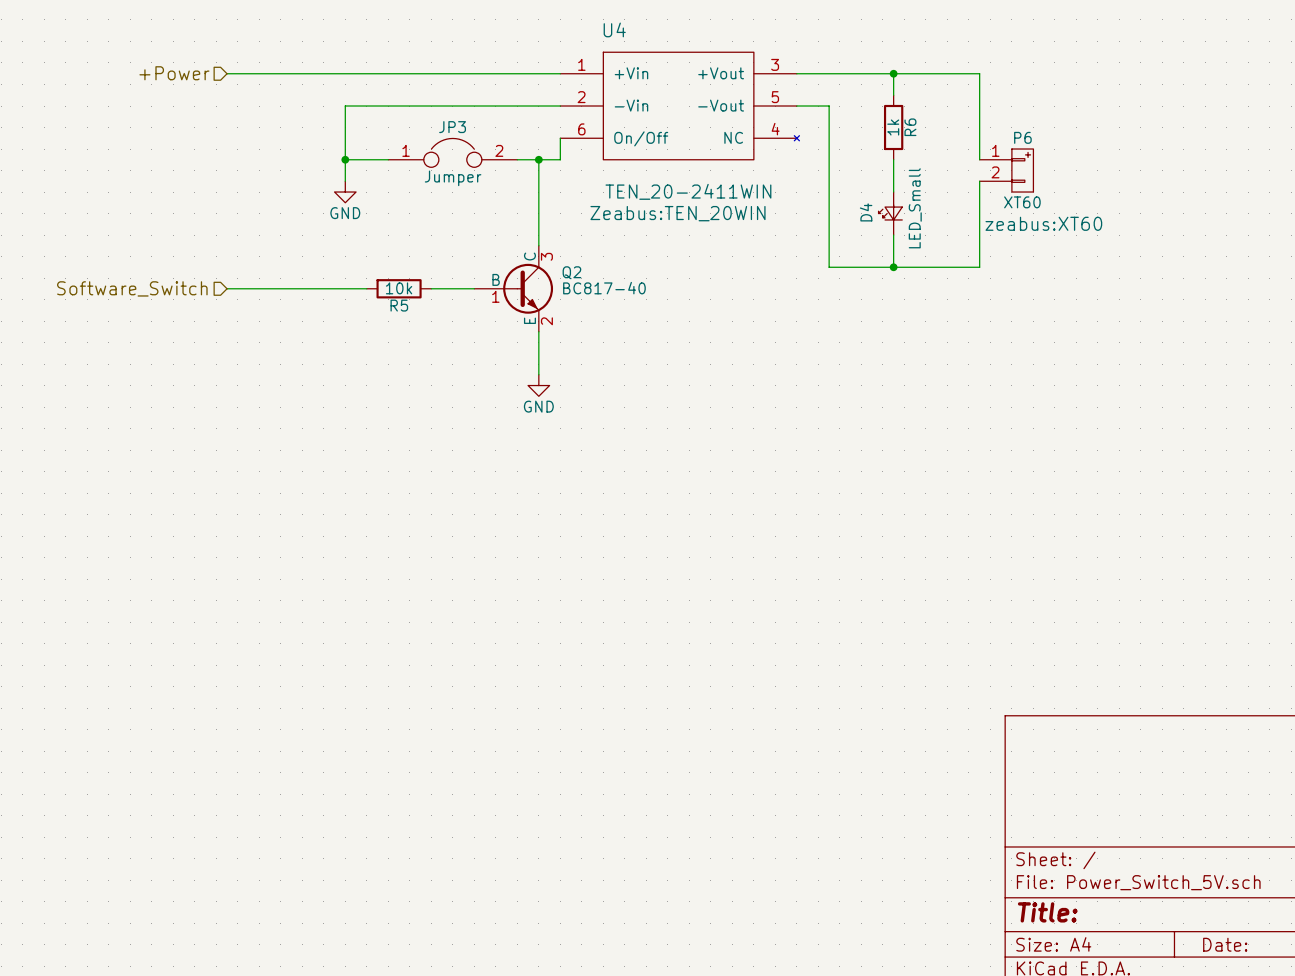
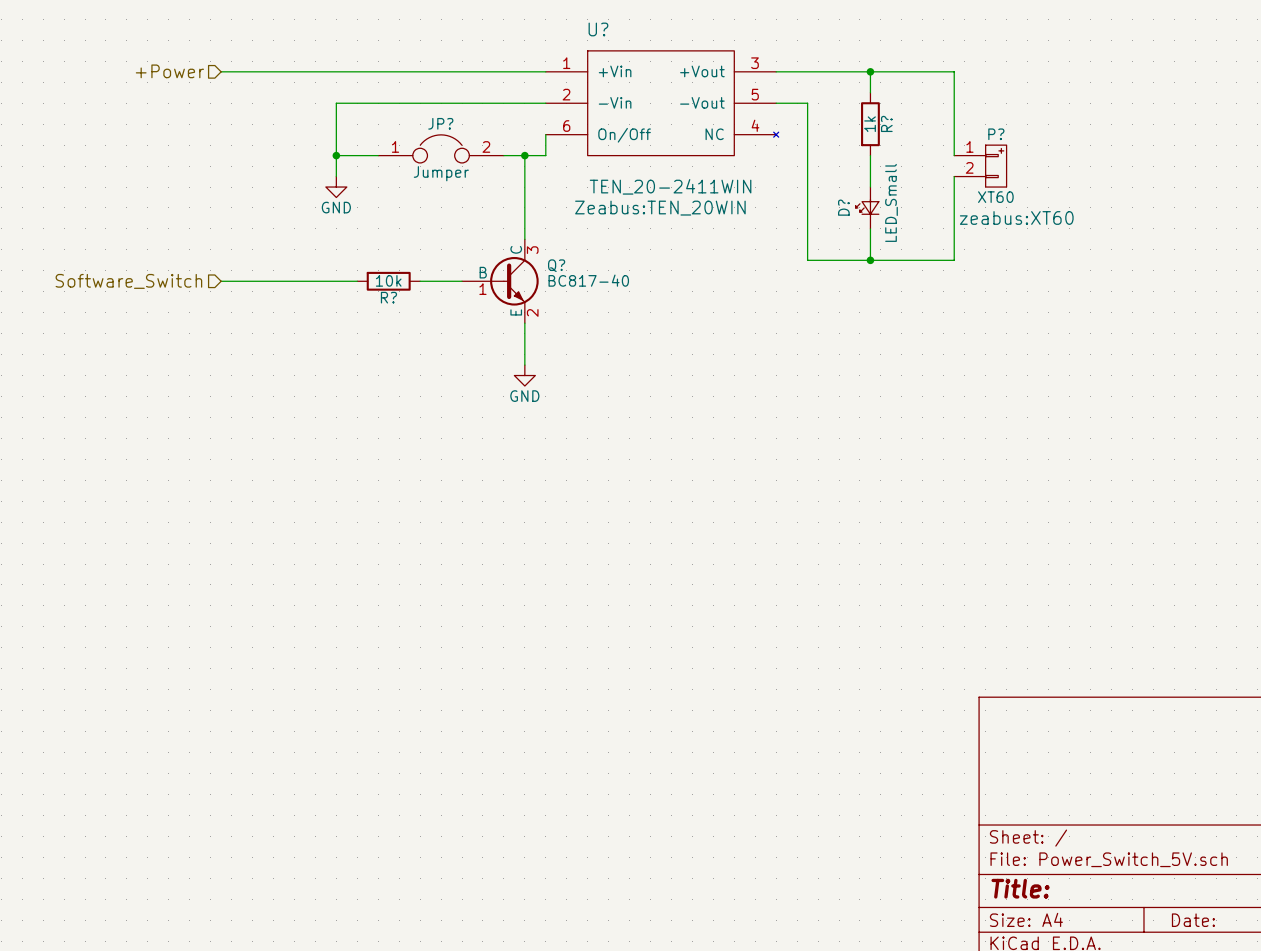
U4 name: U4 (614, 29) -> U? (598, 29)
JP3 name: JP3 (452, 127) -> JP? (440, 123)
R6 name: R6 (910, 127) -> R? (886, 123)
P6 name: P6 (1022, 137) -> P? (996, 134)
D4 name: D4 (866, 212) -> D? (843, 207)
Q2 name: Q2 (571, 272) -> Q? (556, 265)
R5 name: R5 (399, 305) -> R? (388, 297)

